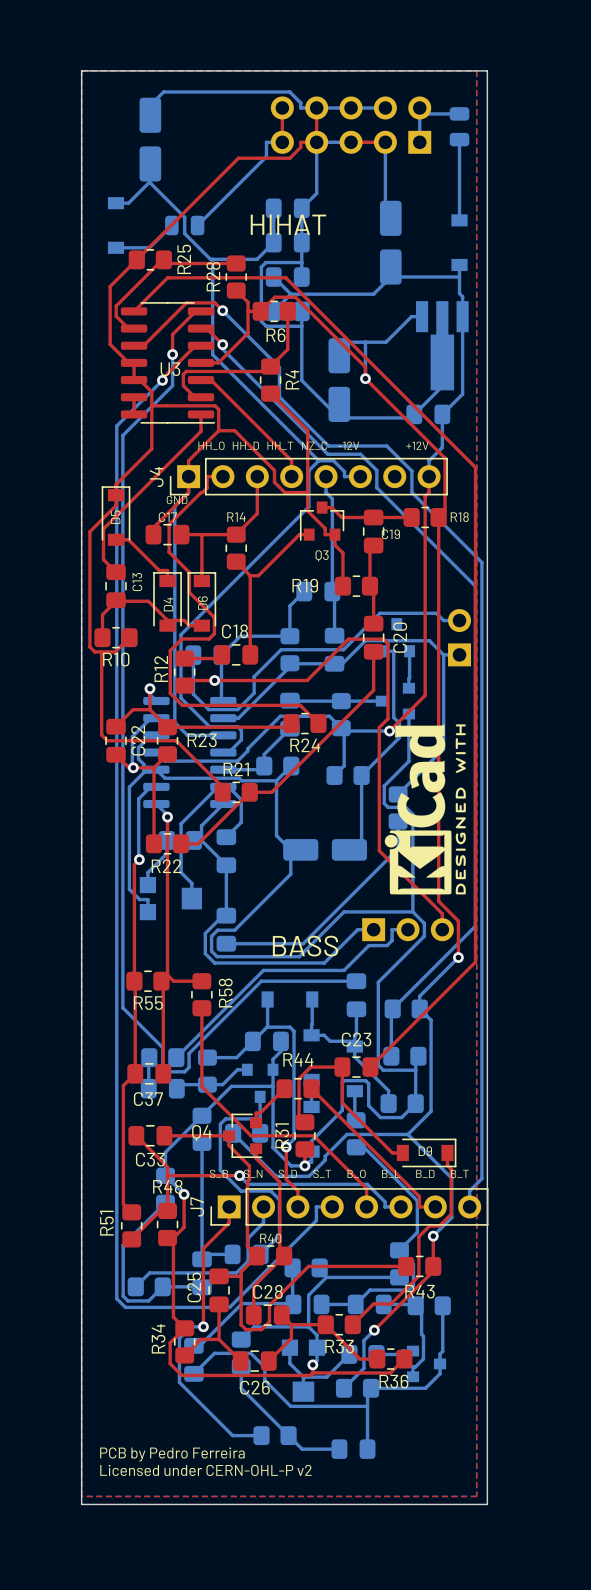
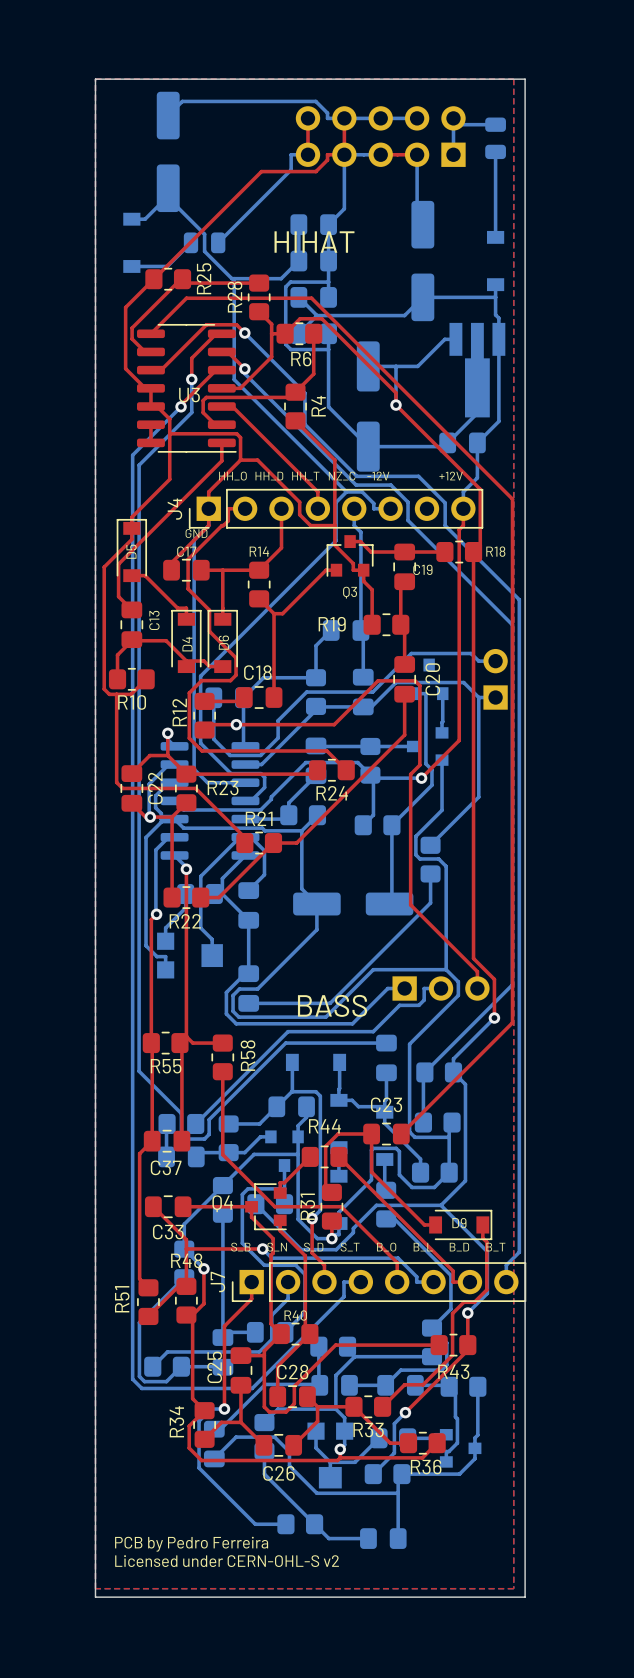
part footprint: [139, 97, 162, 182] -> [156, 91, 180, 213]
part footprint: [379, 200, 402, 285] -> [411, 200, 435, 322]
part footprint: [328, 338, 351, 423] -> [356, 341, 380, 472]
drawing: [384, 724, 466, 895] -> none
part footprint: [283, 839, 368, 861] -> [293, 892, 414, 916]
text: Licensed under CERN-OHL-P v2 (205, 1470) -> Licensed under CERN-OHL-S v2 (227, 1561)

